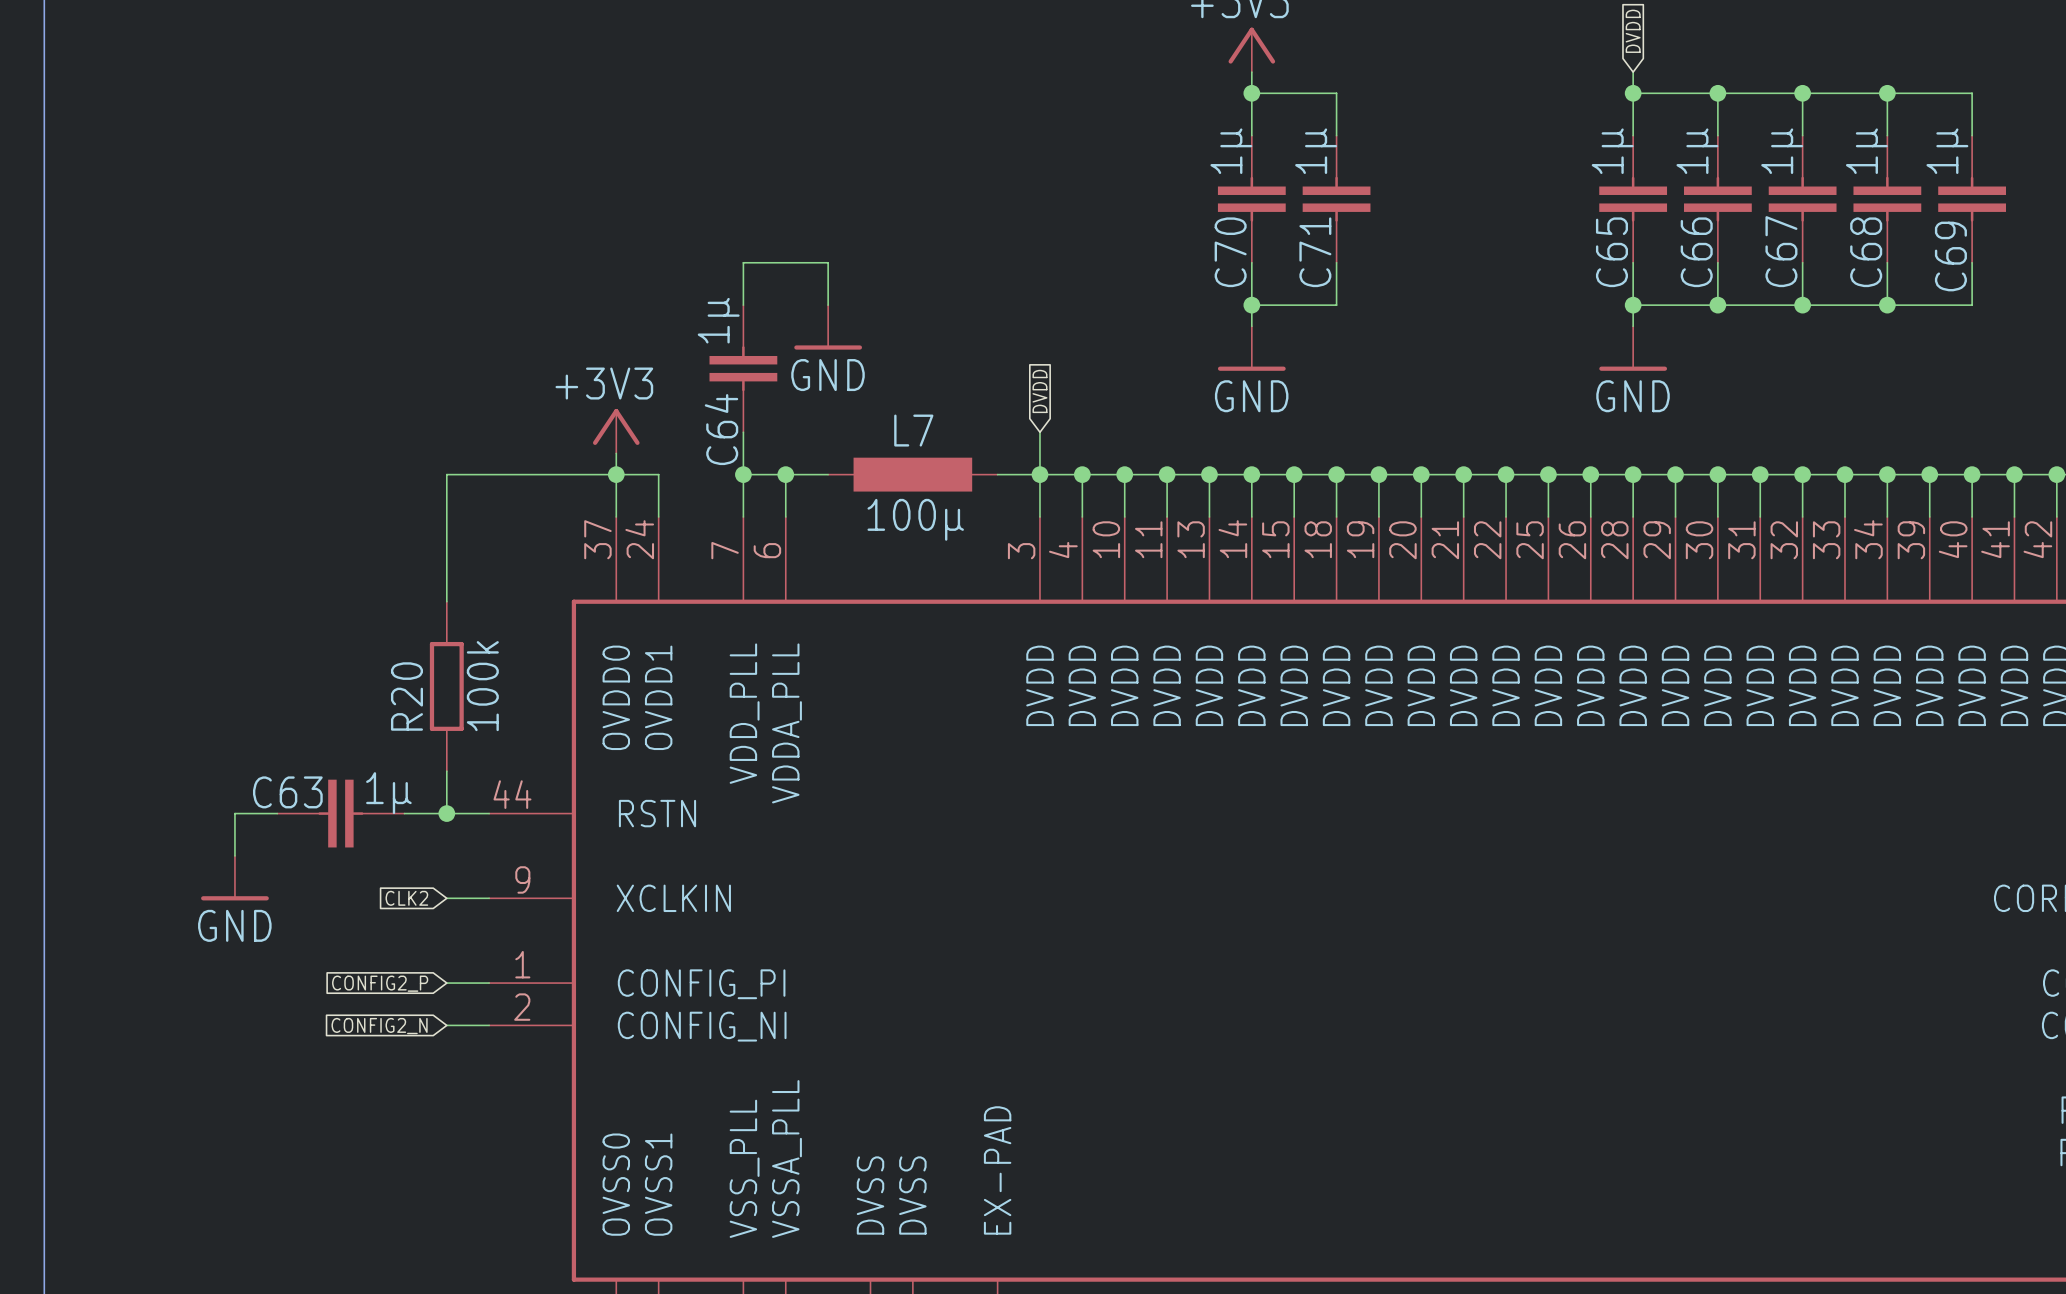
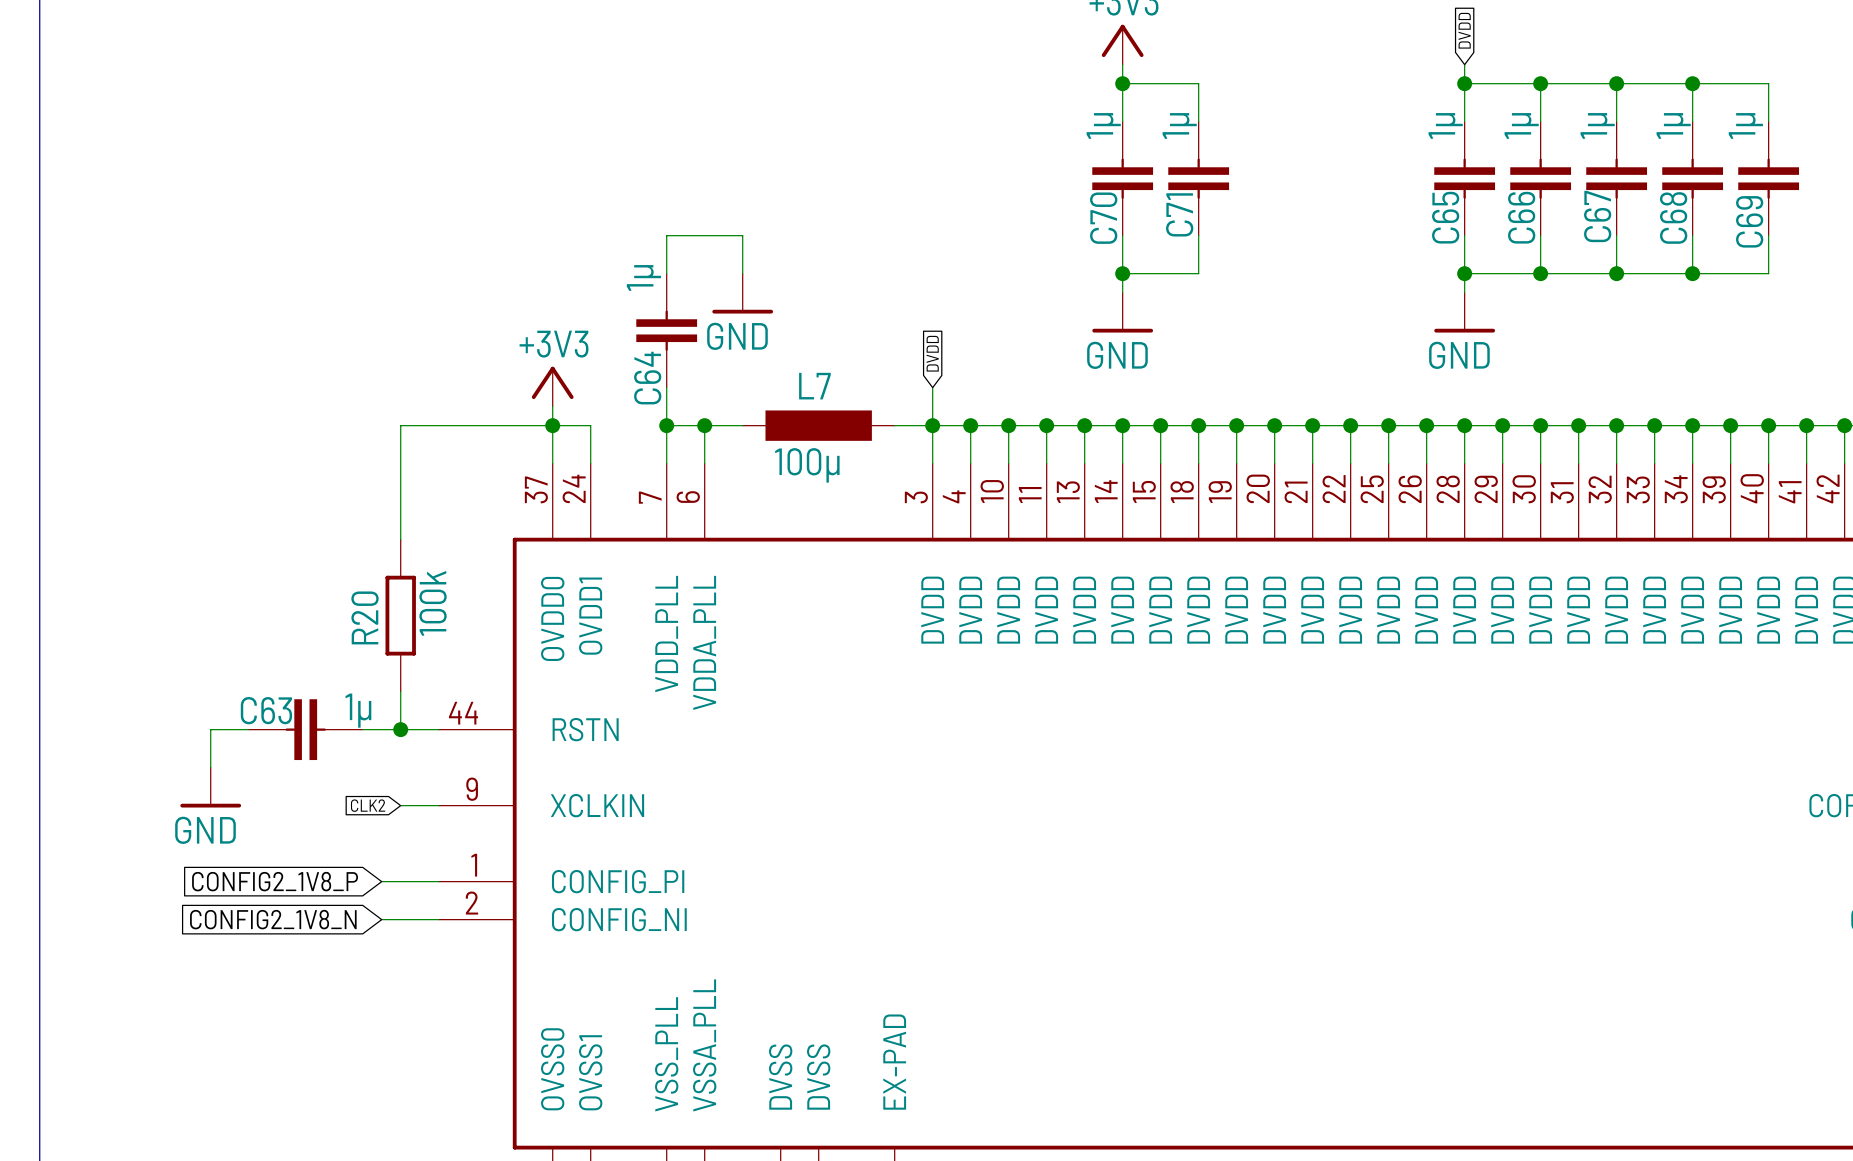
global label: CONFIG2_P (380, 983) -> CONFIG2_1V8_P (275, 881)
wire: none -> (381, 881) (400, 881)
wire: none -> (381, 919) (400, 919)
global label: CONFIG2_N (379, 1026) -> CONFIG2_1V8_N (273, 919)

